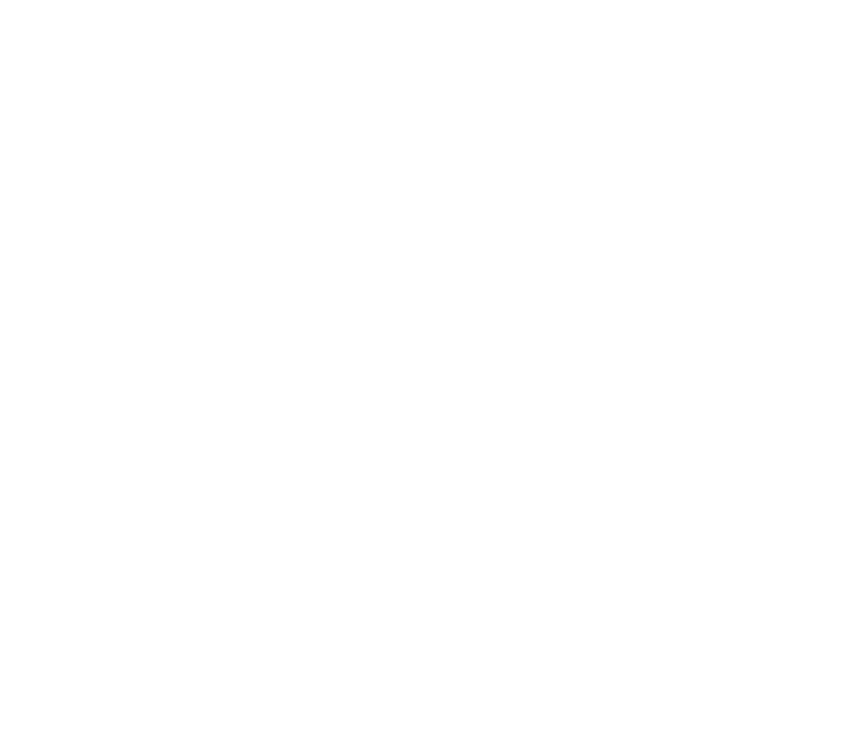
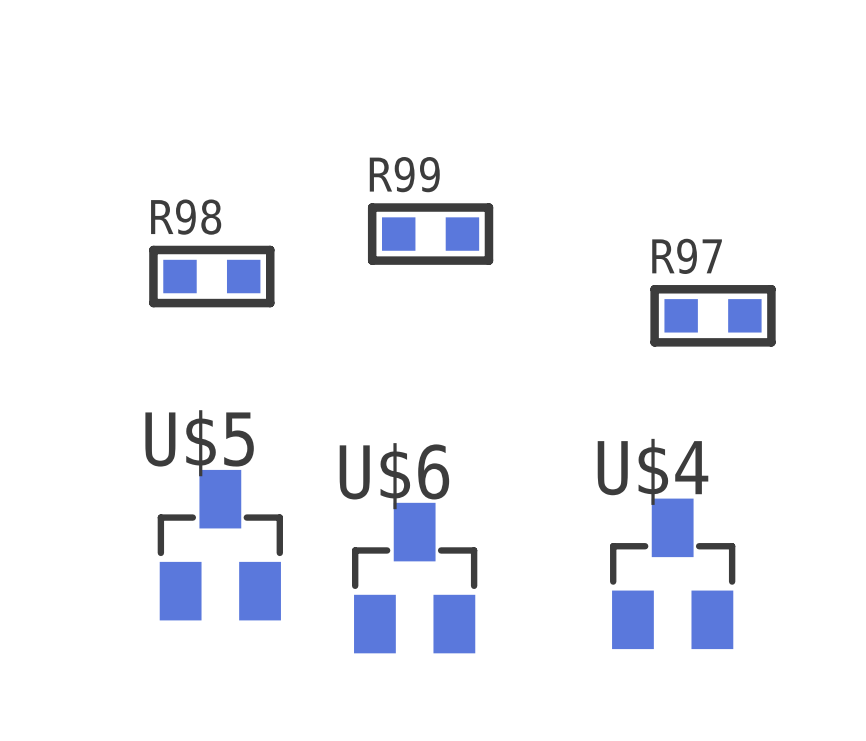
R99: none -> (430, 234)
R98: none -> (211, 276)
R97: none -> (713, 315)
U$5: none -> (220, 545)
U$4: none -> (672, 573)
U$6: none -> (414, 578)

